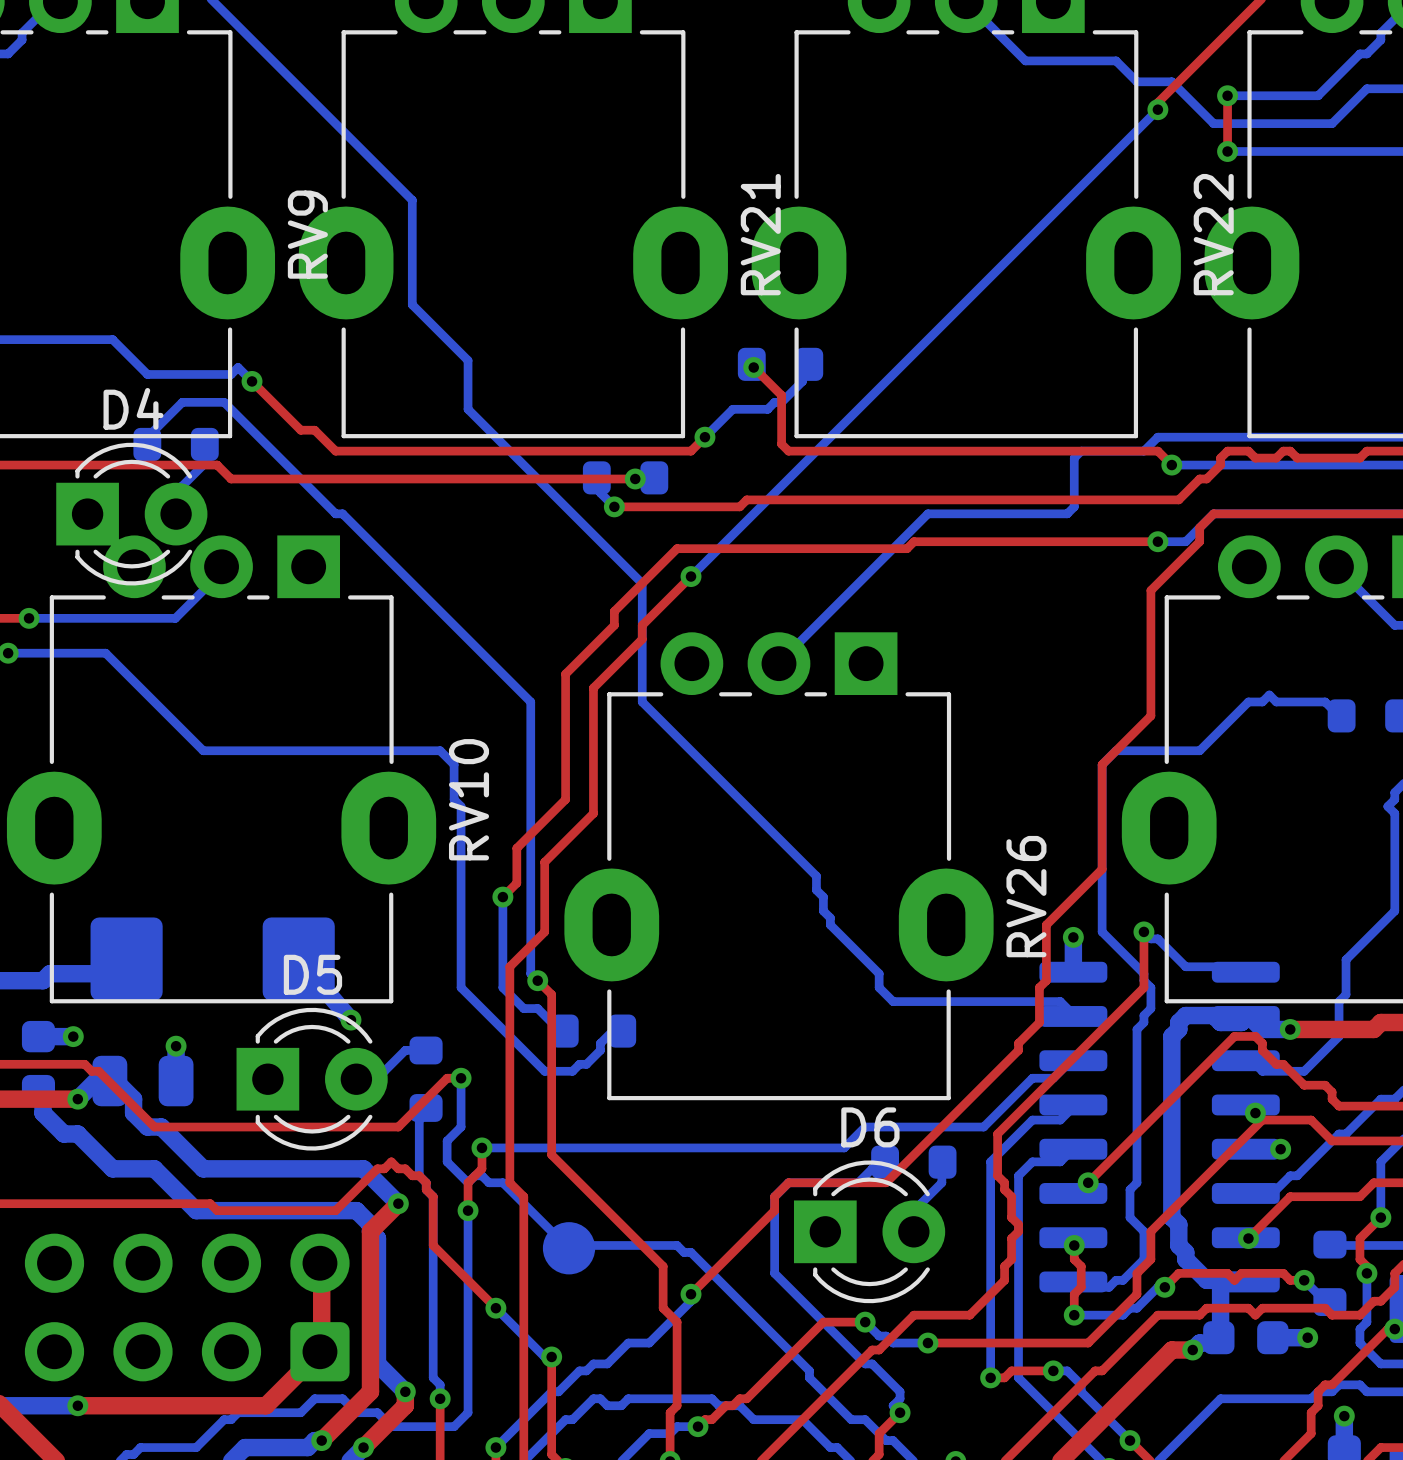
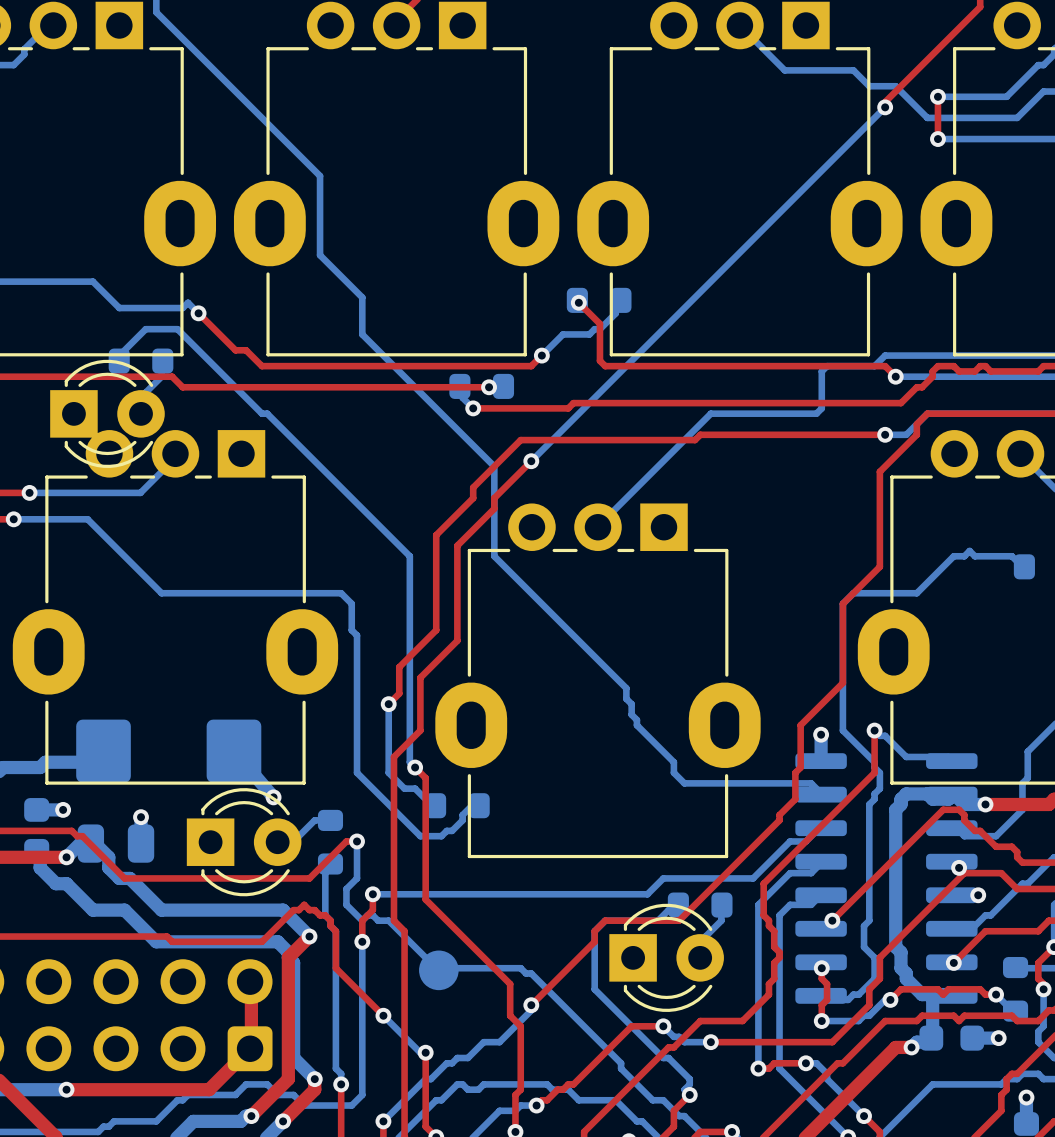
RV9 name: RV9 (307, 234) -> none
RV21 name: RV21 (760, 234) -> none
RV22 name: RV22 (1213, 234) -> none
D4 name: D4 (133, 408) -> none
RV10 name: RV10 (469, 799) -> none
RV26 name: RV26 (1026, 896) -> none
D5 name: D5 (312, 974) -> none
D6 name: D6 (870, 1127) -> none

